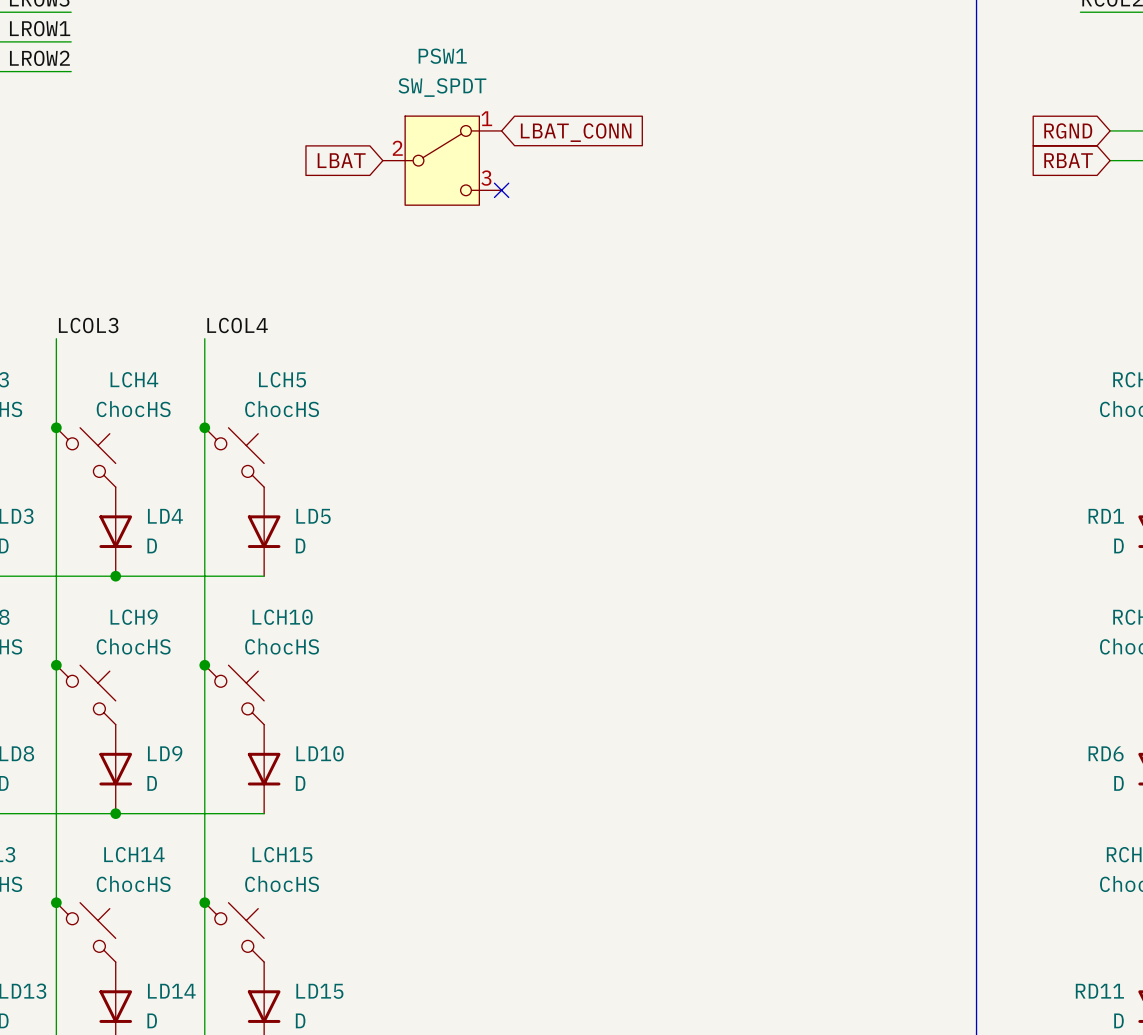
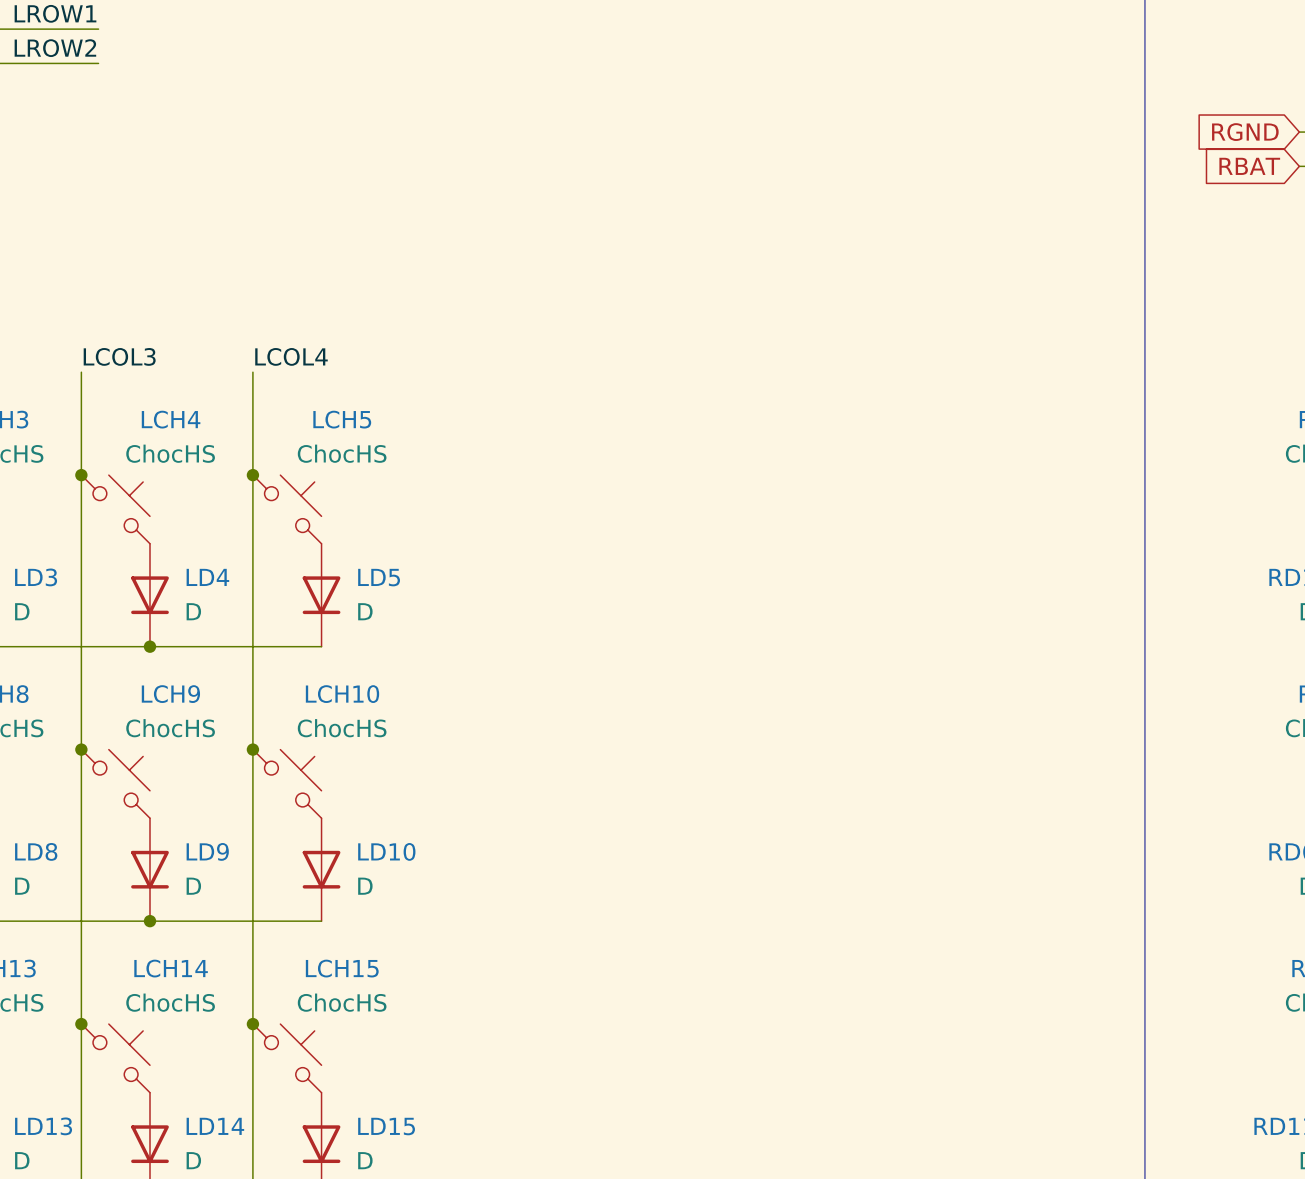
global label: LBAT_CONN (576, 132) -> none
global label: LBAT (341, 160) -> none
PSW1: SW_SPDT (442, 160) -> none
no-connect mark: (501, 190) -> none

